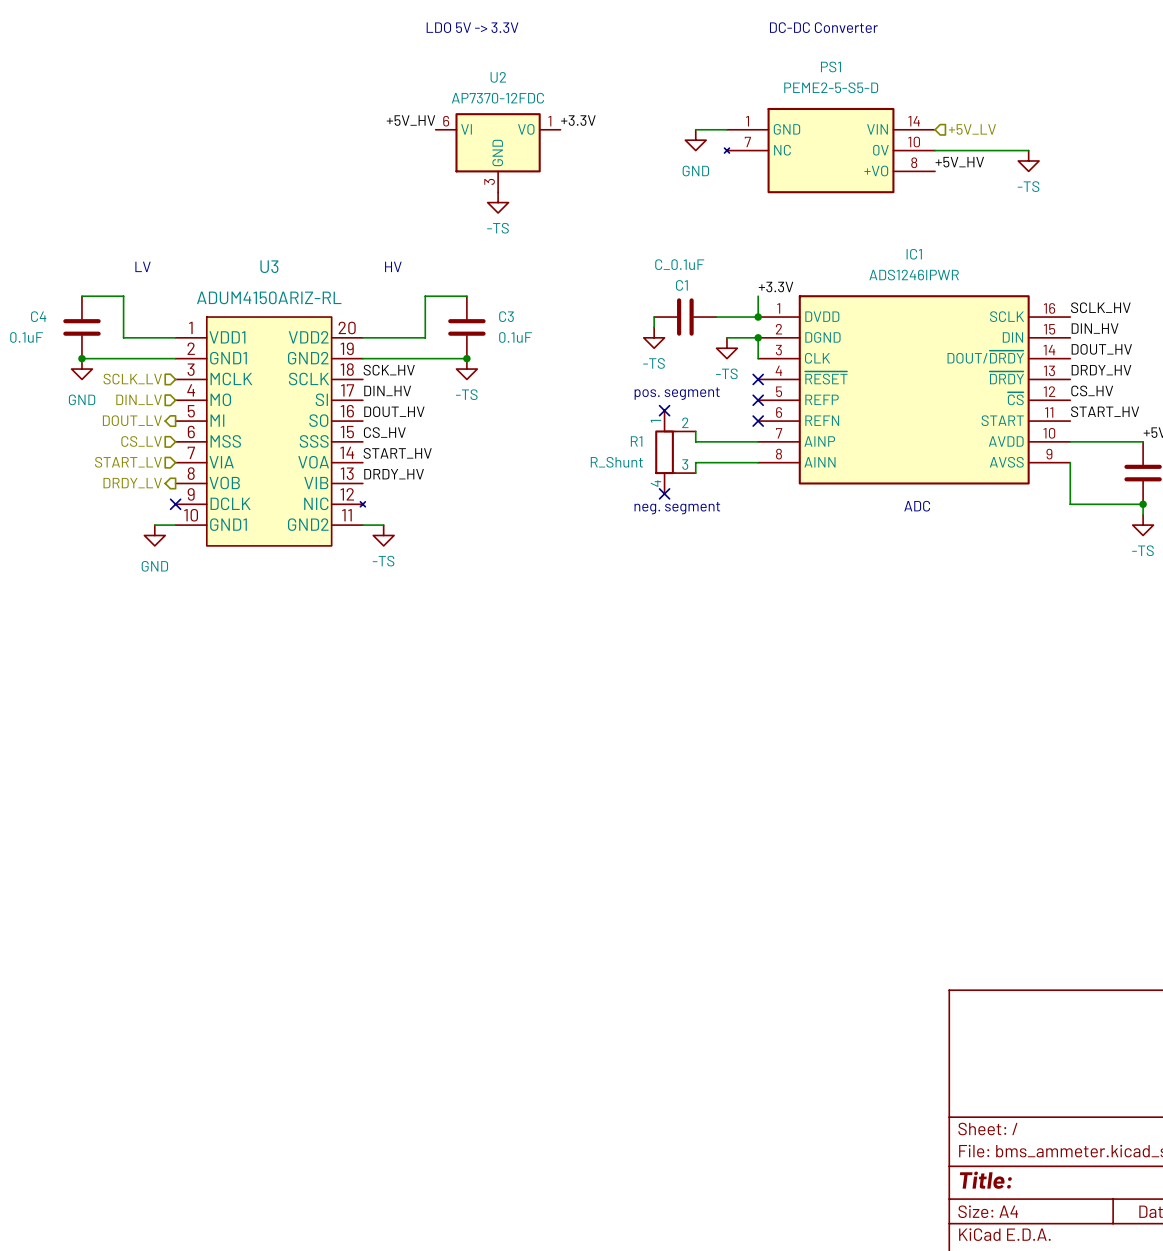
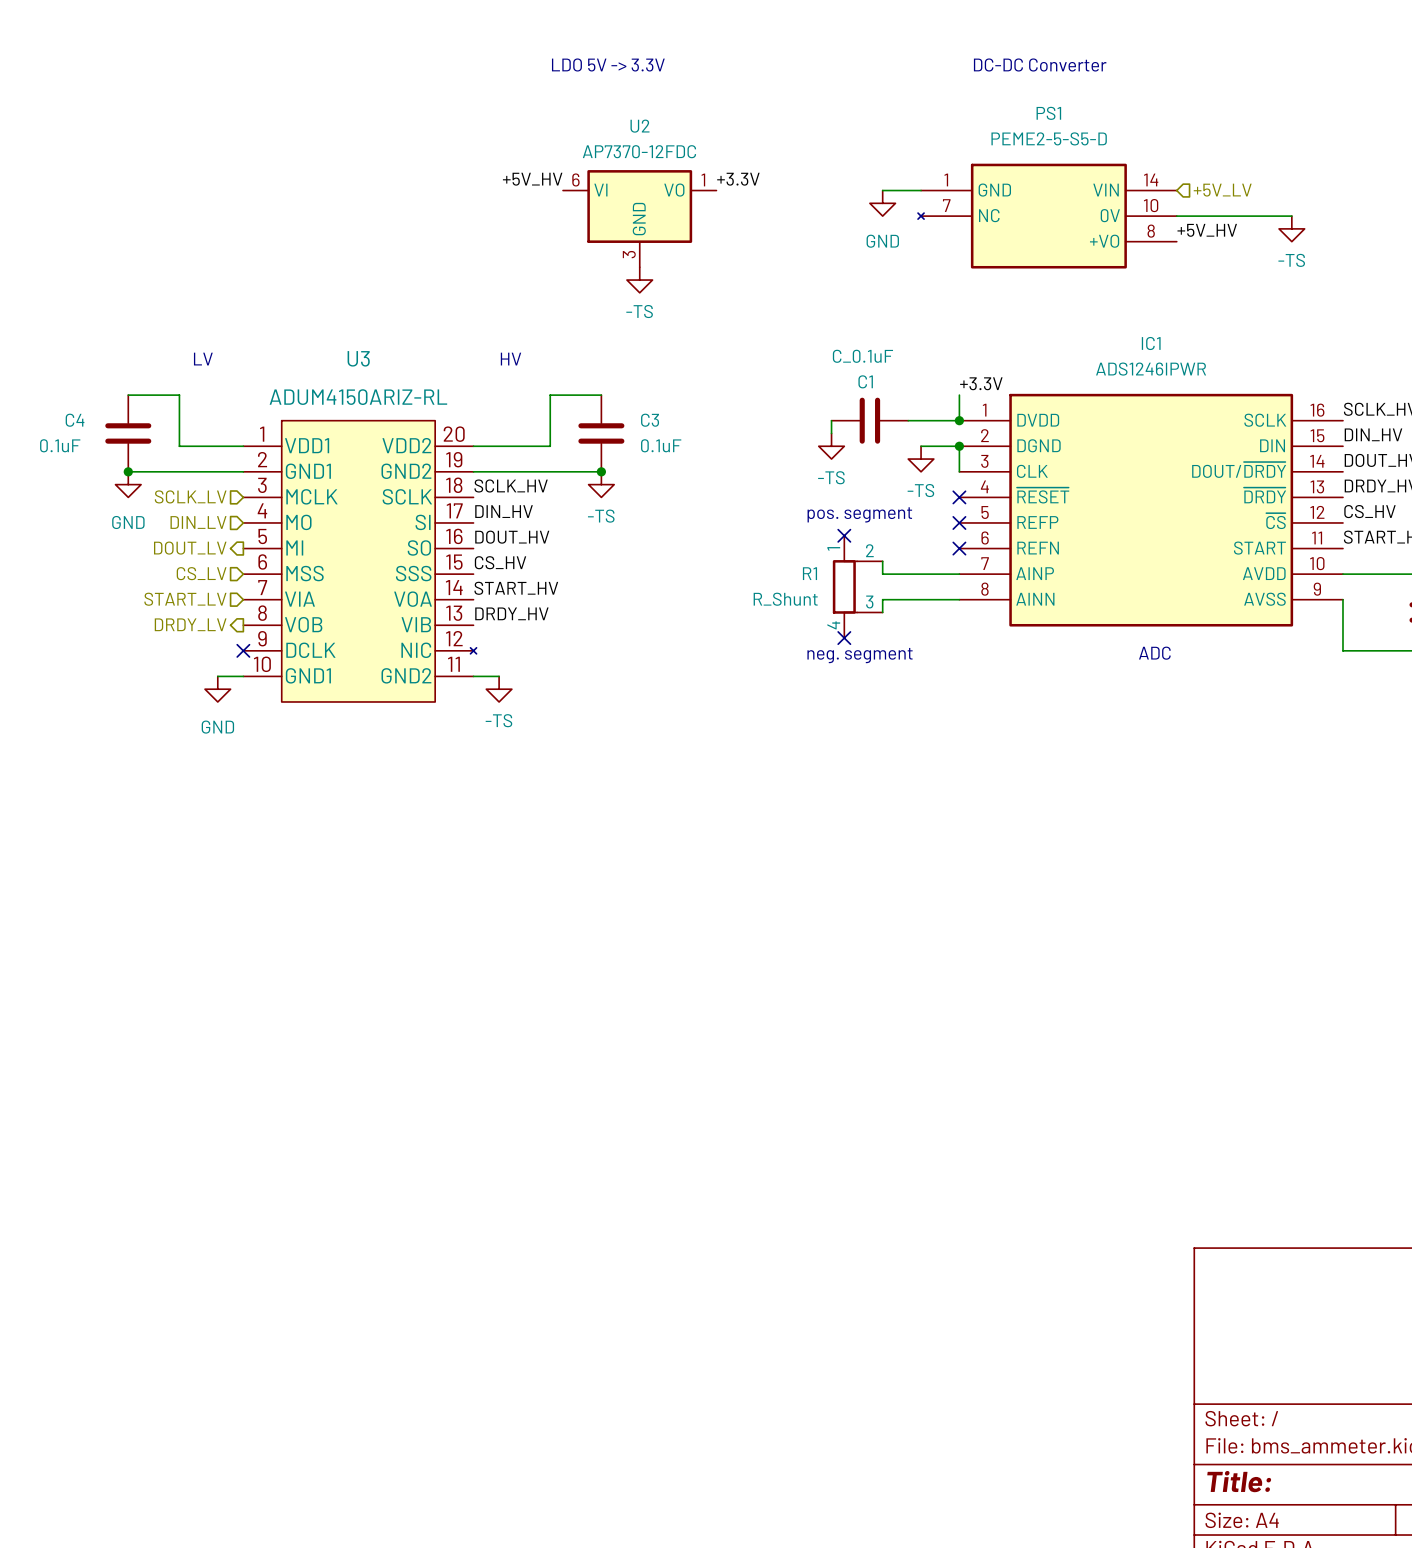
label: SCK_HV (389, 370) -> SCLK_HV (511, 486)

